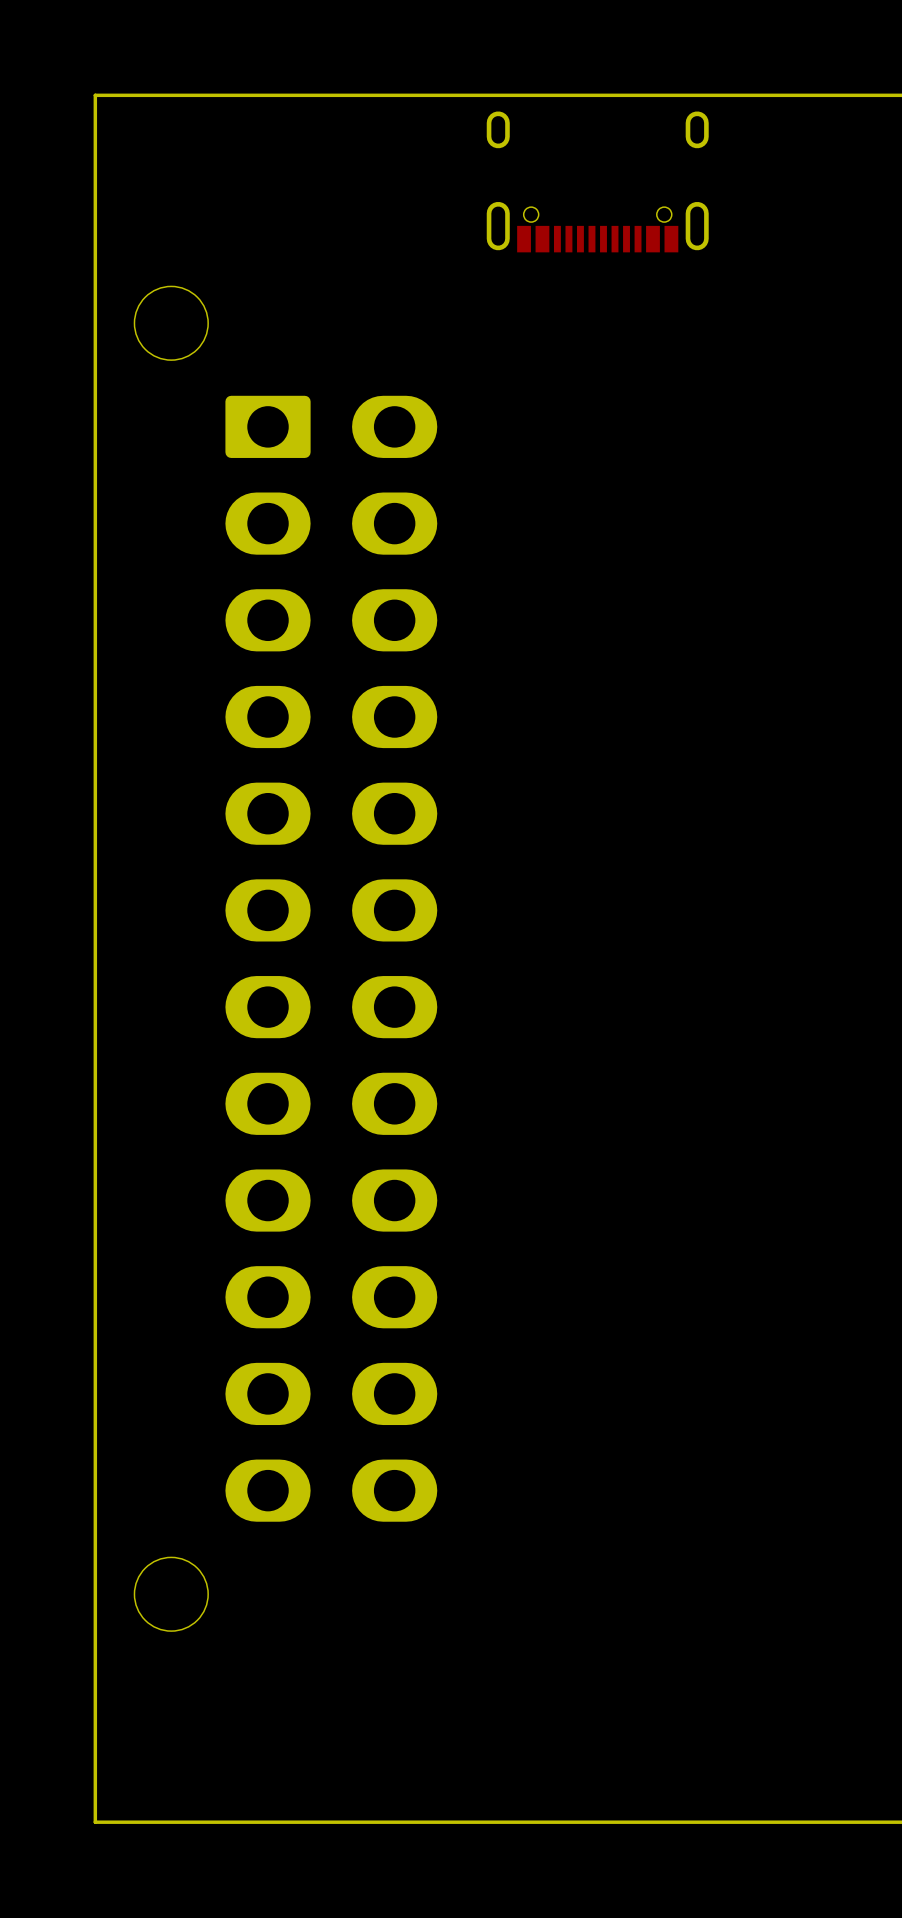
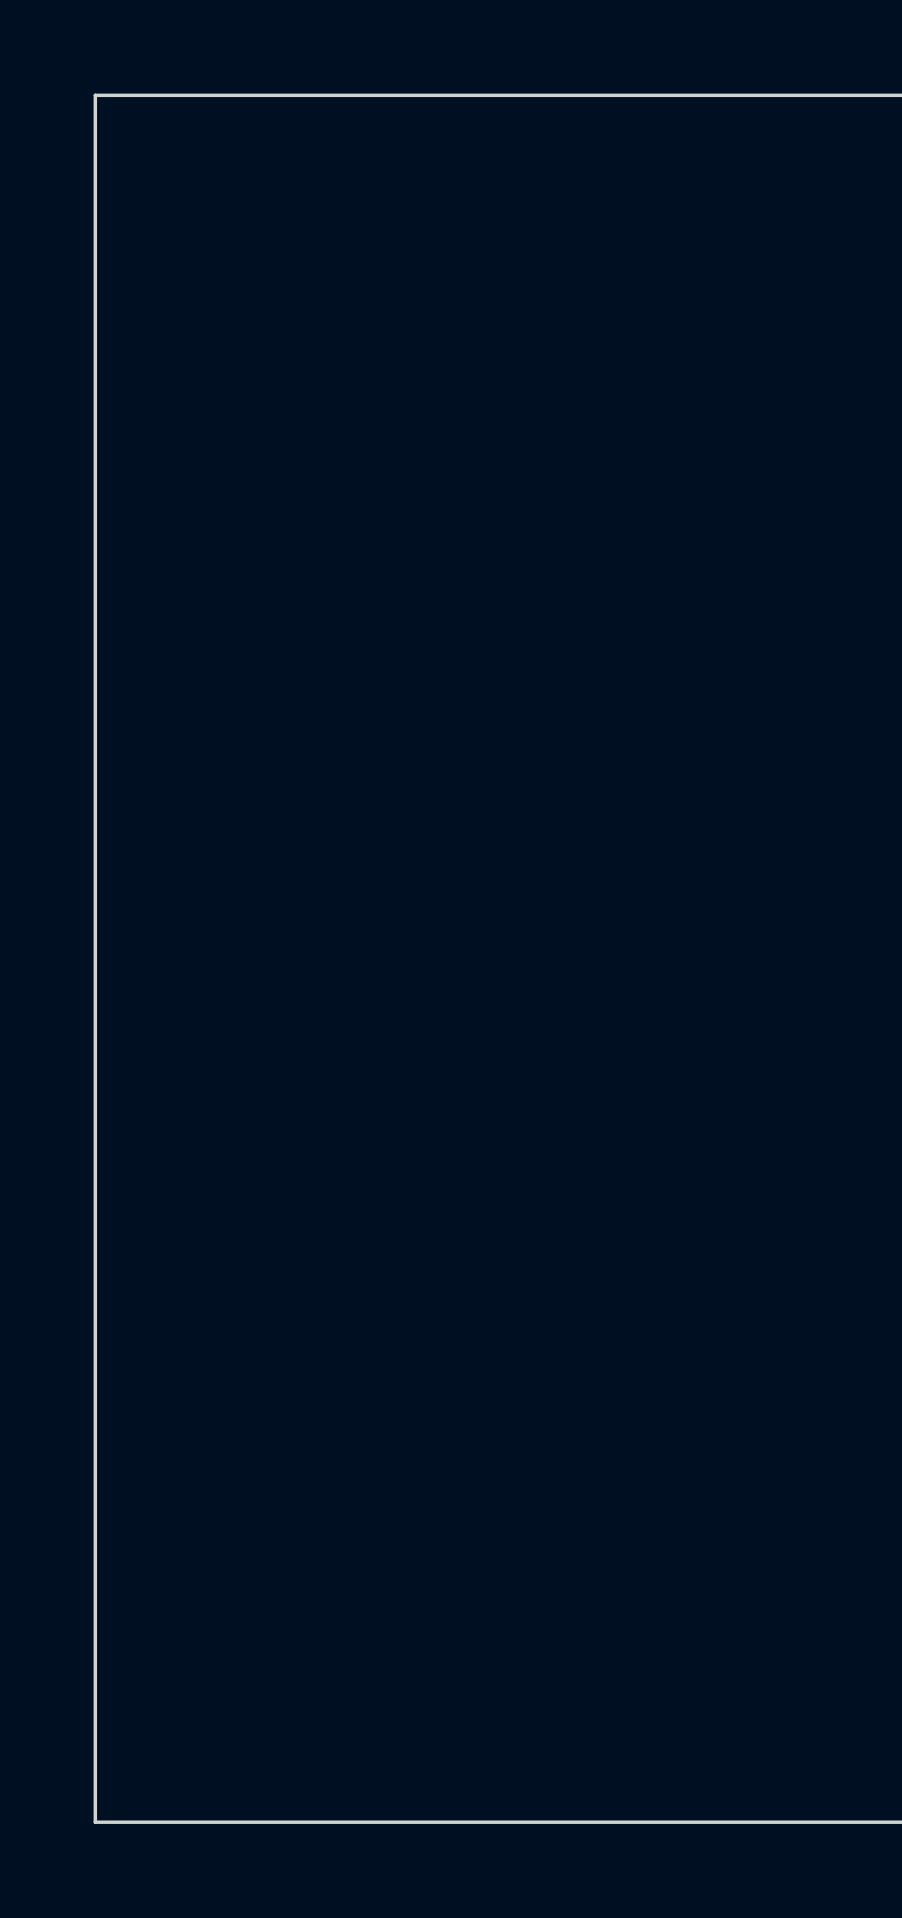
part: (597, 181) -> none
part: (285, 958) -> none

